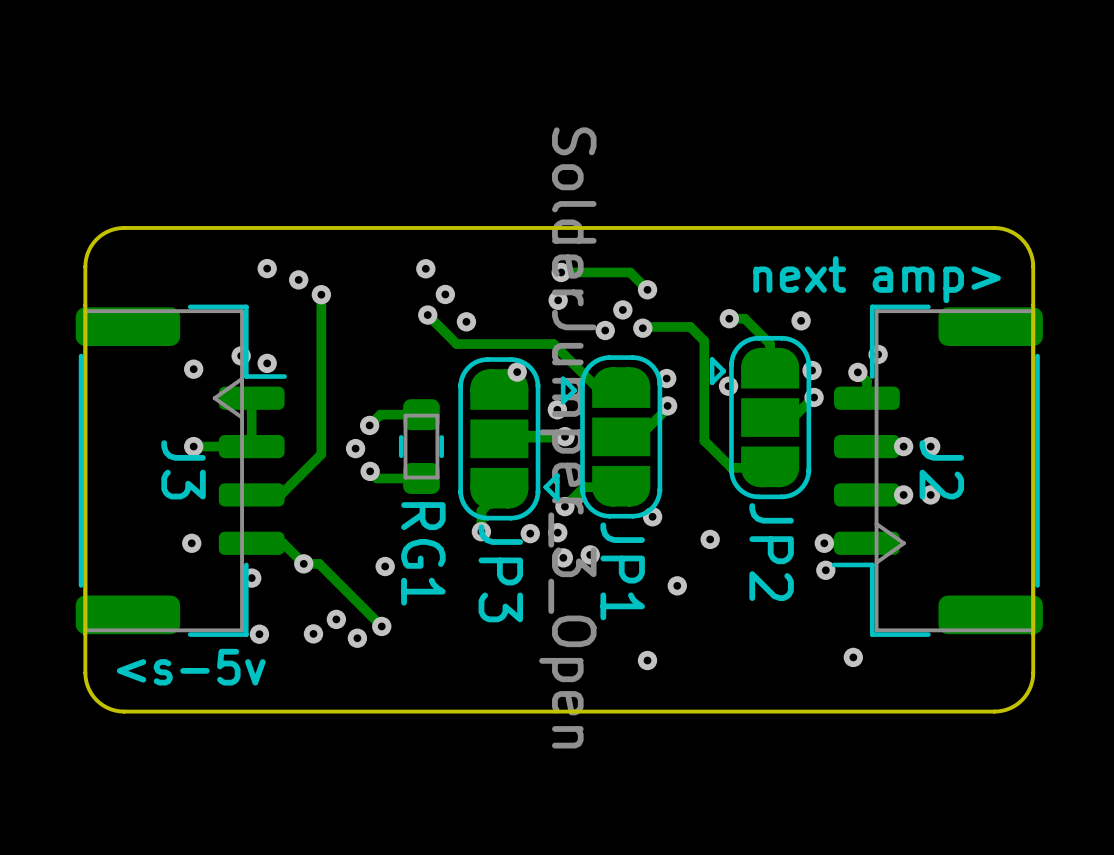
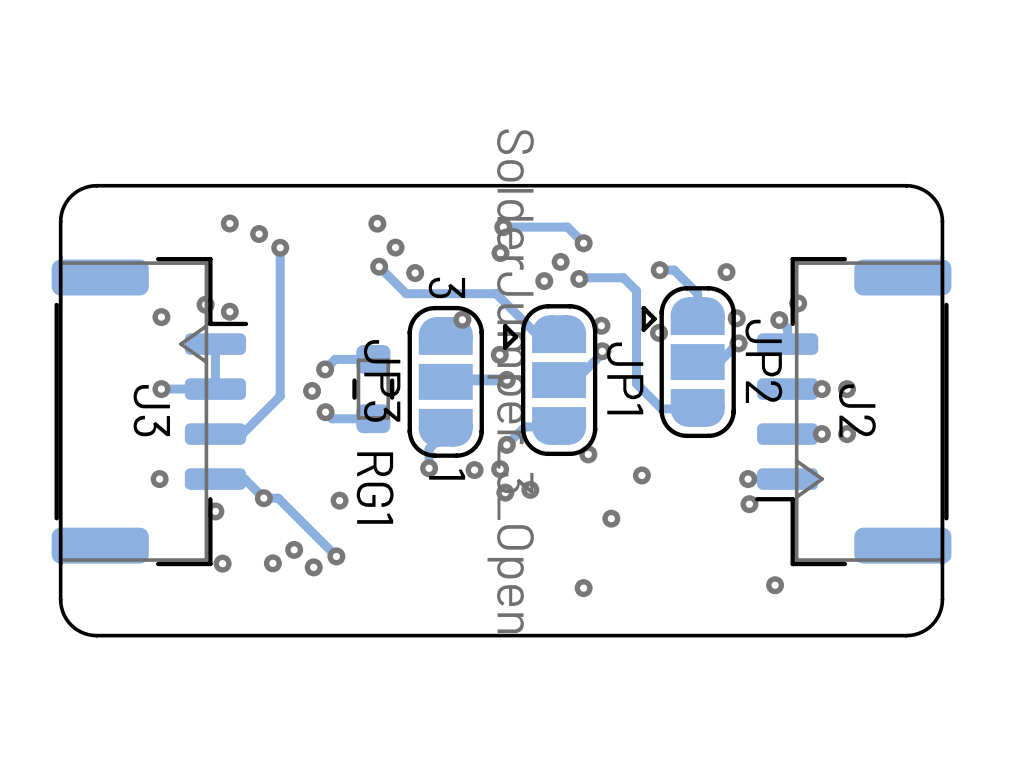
text: next amp> (877, 279) -> none
JP3 footprint: [458, 357, 560, 521] -> [407, 305, 484, 458]
JP2 name position: JP2 (771, 552) -> JP2 (763, 361)
JP1 name position: JP1 (622, 571) -> JP1 (625, 378)
JP3 name position: JP3 (500, 573) -> JP3 (382, 380)
text: <s-5v (191, 667) -> none

